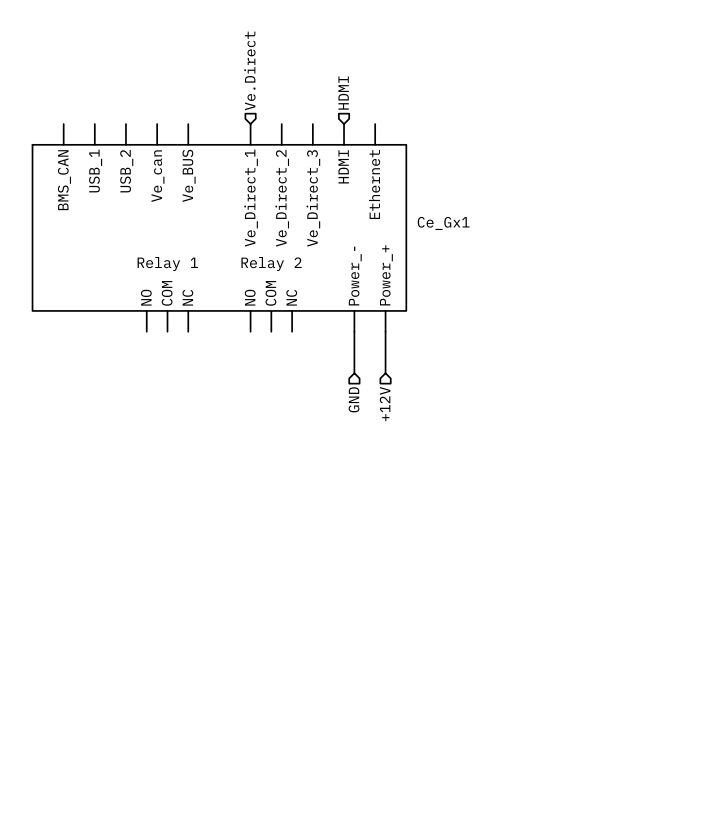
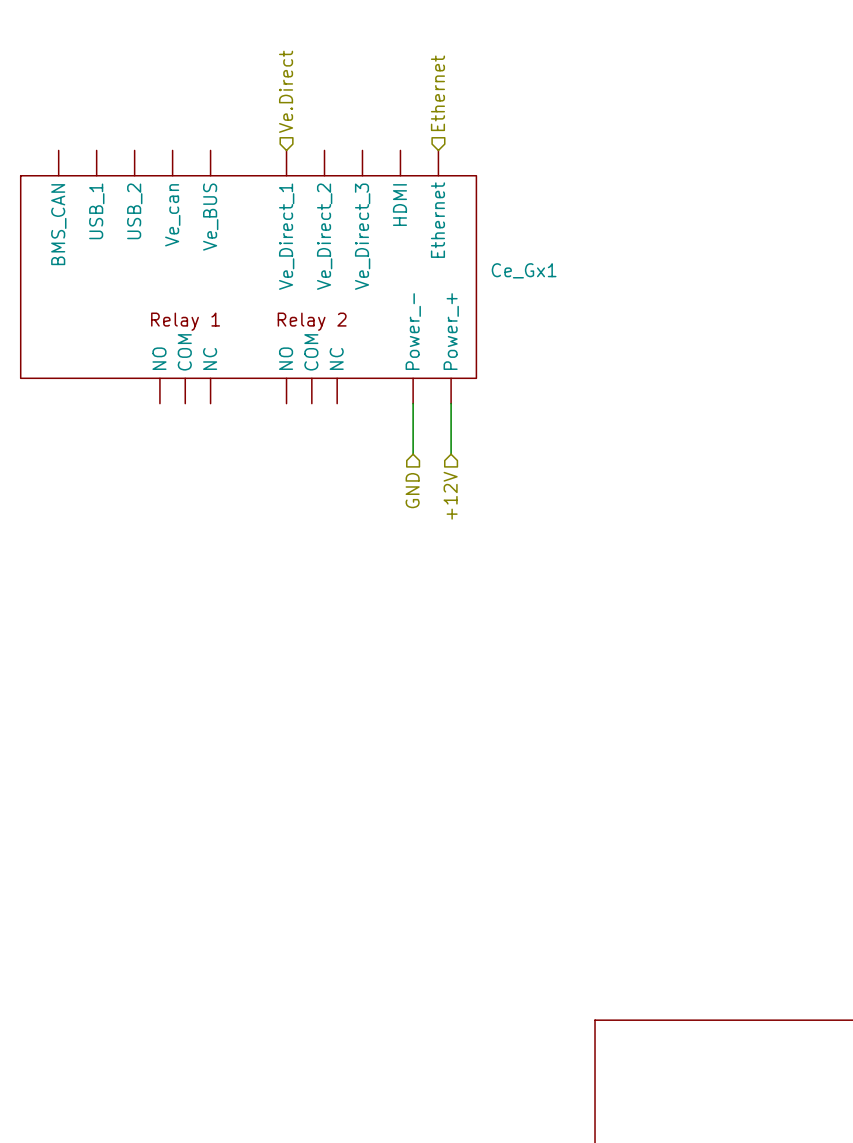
hierarchical label: none -> Ethernet (437, 93)
hierarchical label: HDMI (343, 93) -> none

